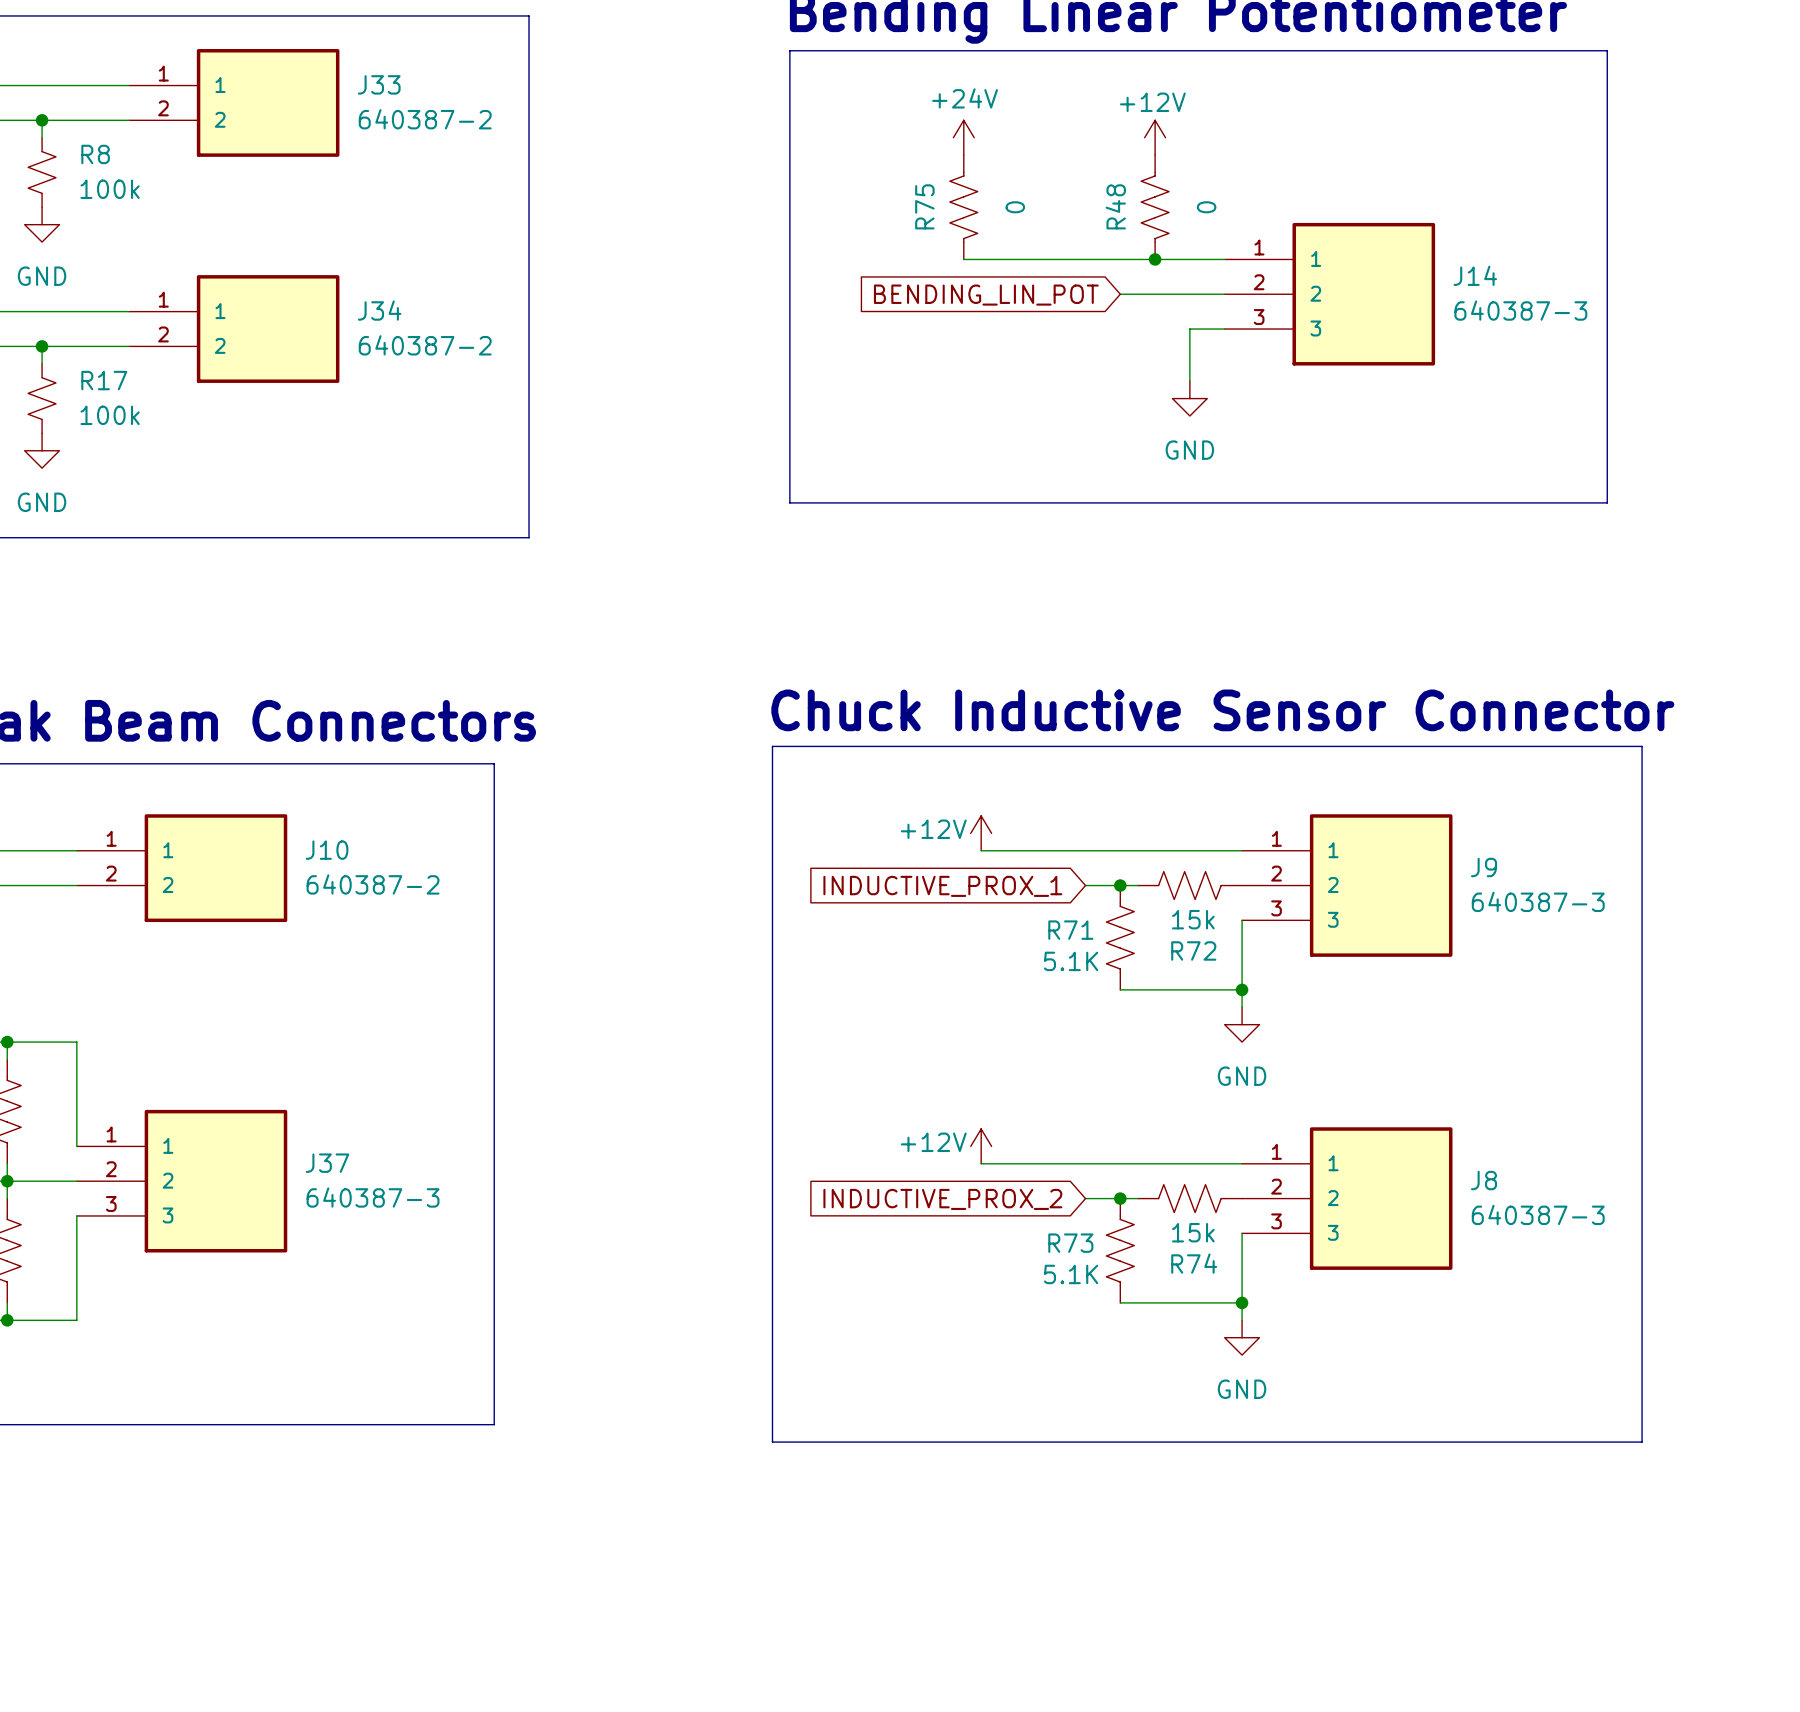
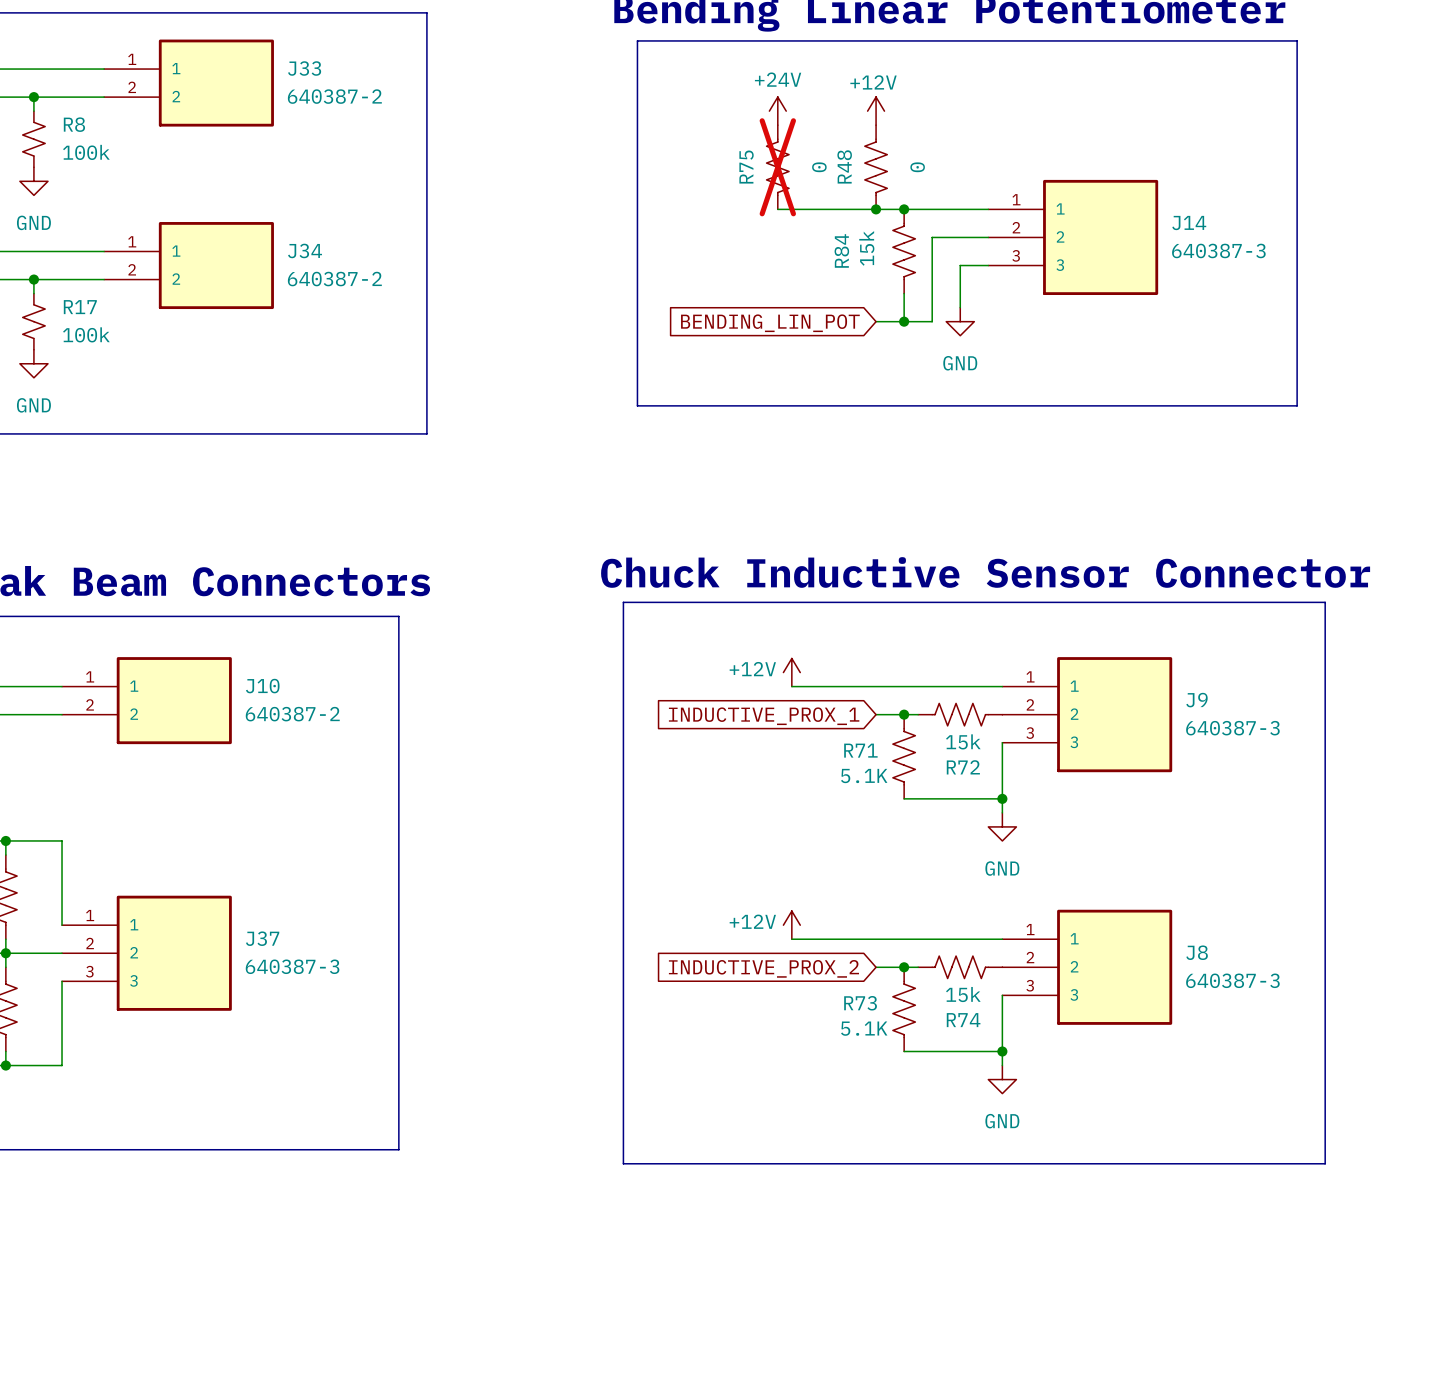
power symbol position: +12V (1155, 137) -> +12V (876, 111)
R75 do-not-place cross: none -> (777, 167)
R48 position: (1155, 207) -> (876, 167)
junction: none -> (876, 209)
junction: none -> (904, 209)
junction: (1155, 259) -> none
wire: (1120, 294) (1155, 294) -> (876, 321) (932, 321) (932, 237)
global label position: BENDING_LIN_POT (986, 295) -> BENDING_LIN_POT (770, 323)
R84: none -> 15k (904, 251)
wire: none -> (904, 293) (904, 321)
junction: none -> (904, 321)

